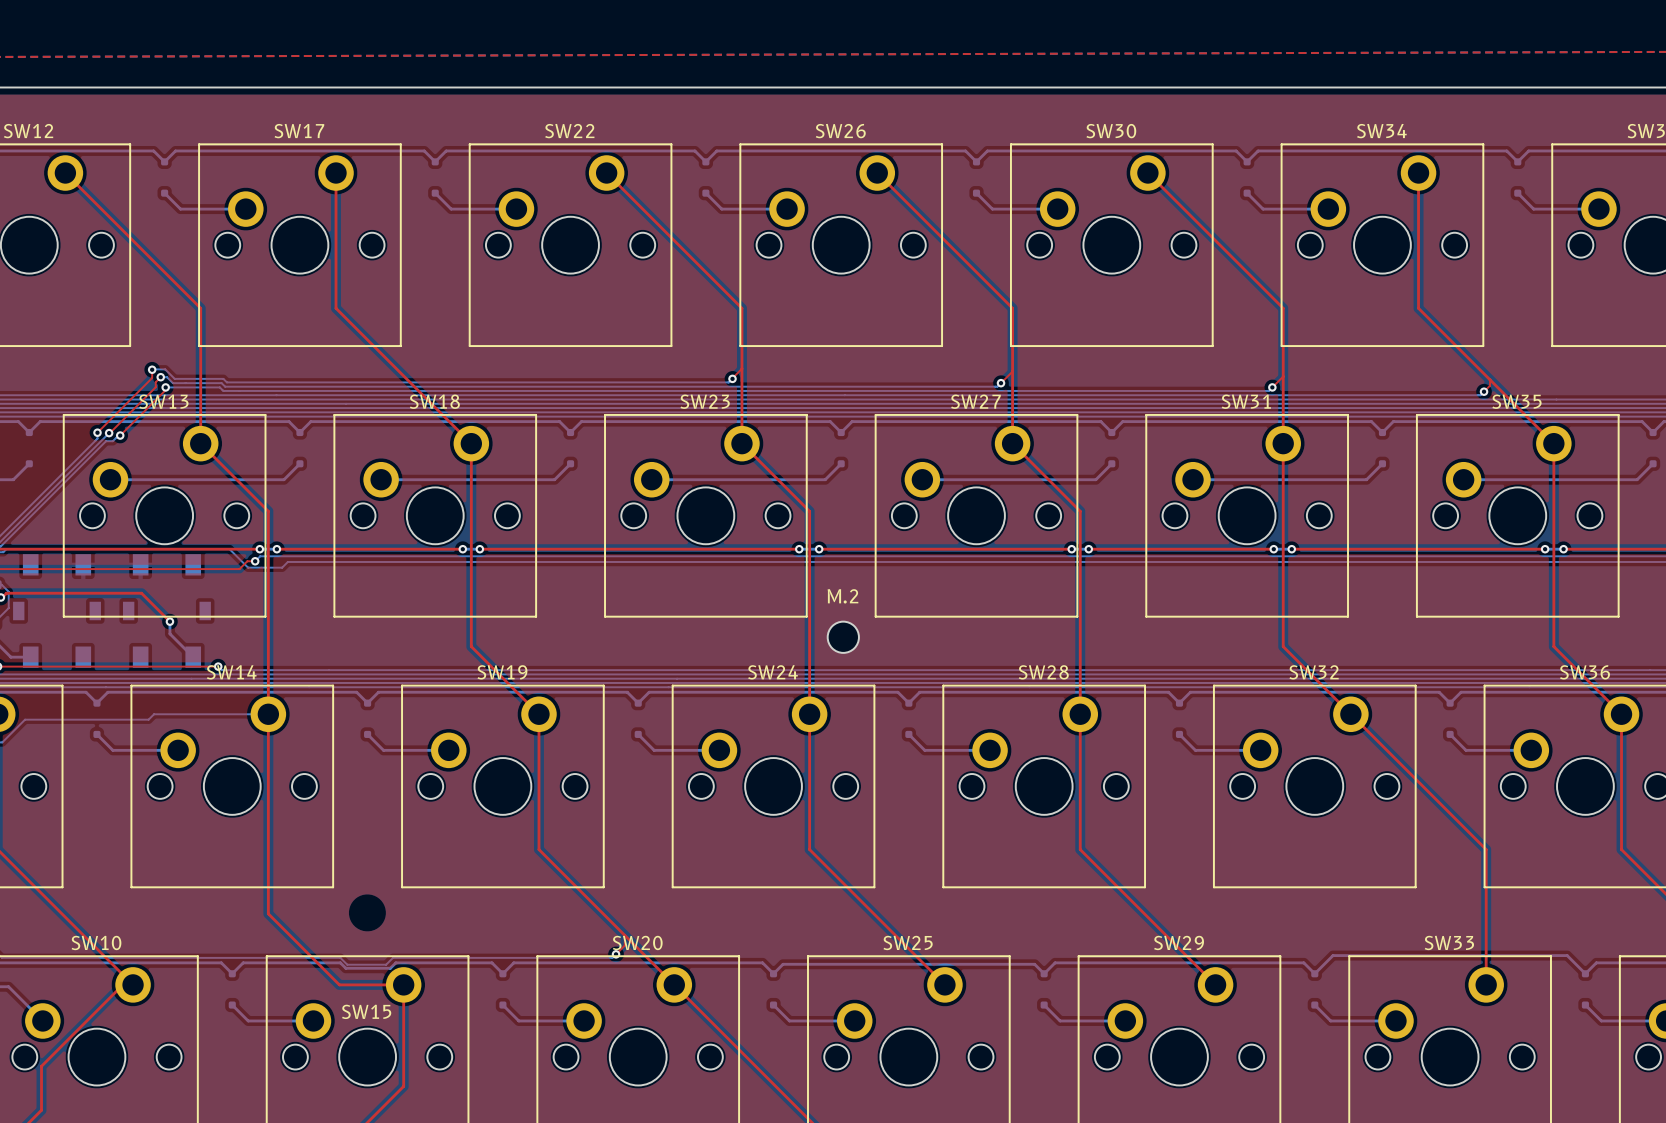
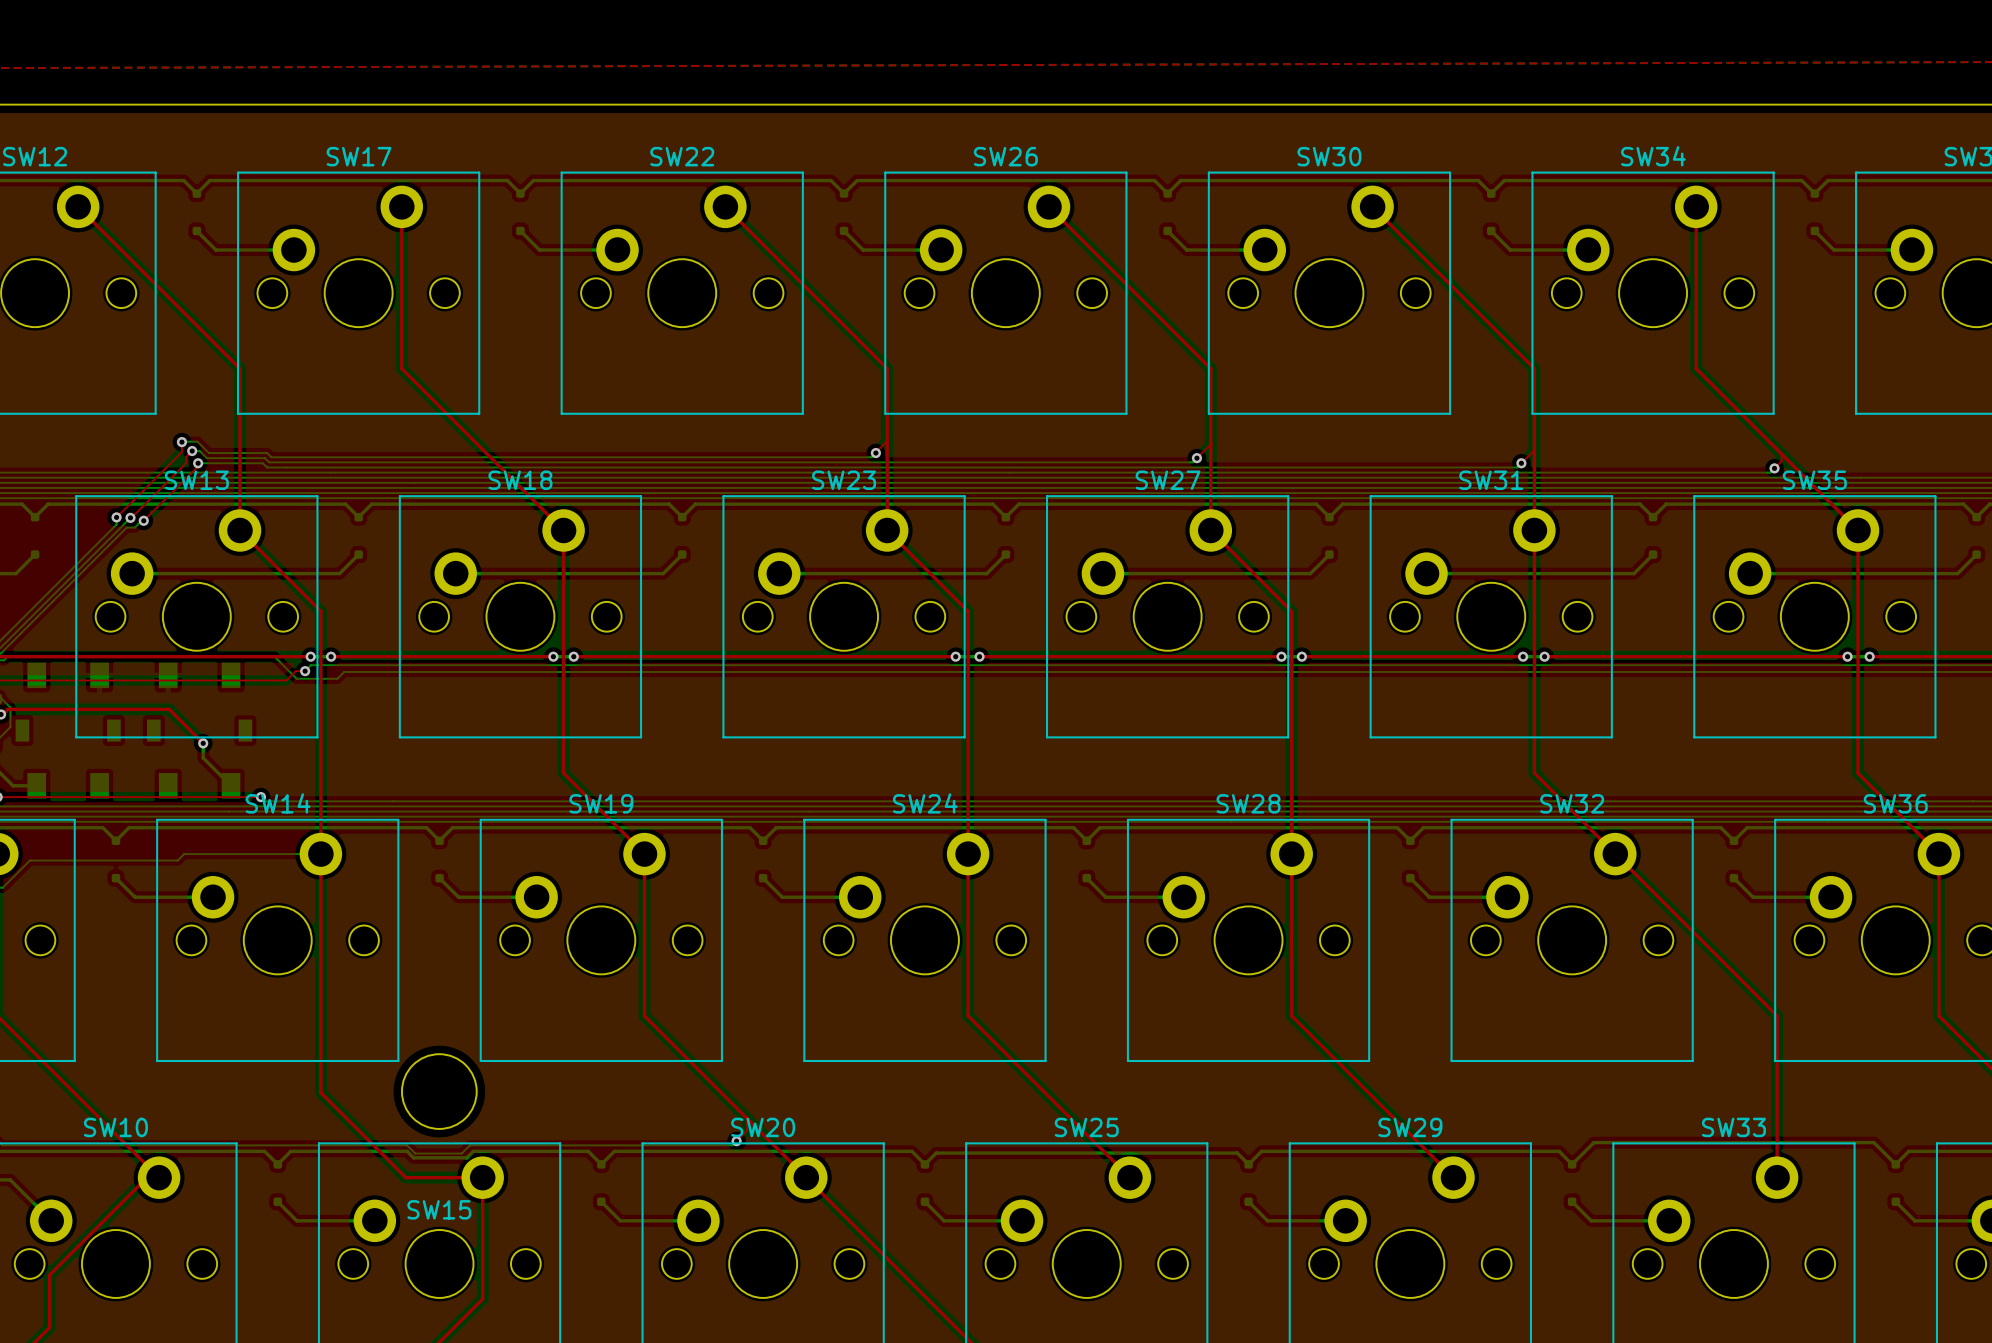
M.2: (843, 637) -> none
round board edge: none -> [401, 1053, 478, 1130]

